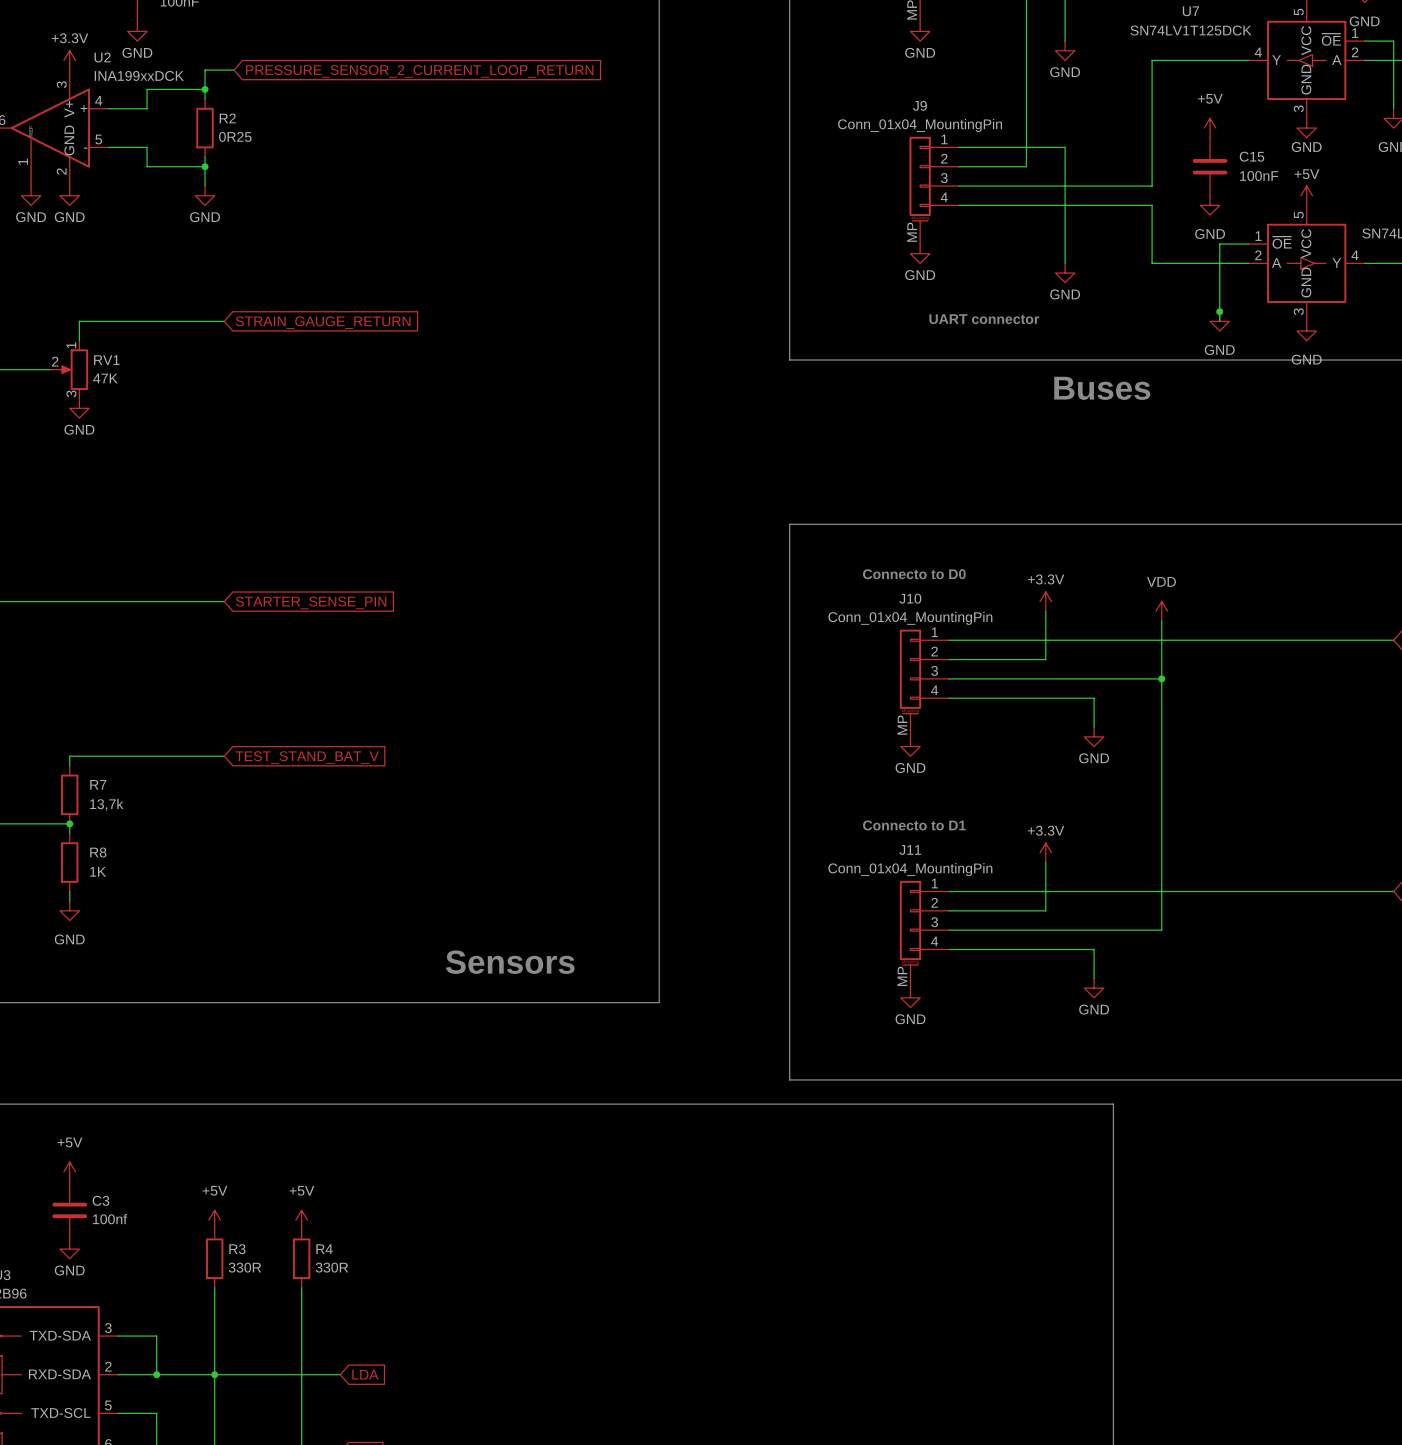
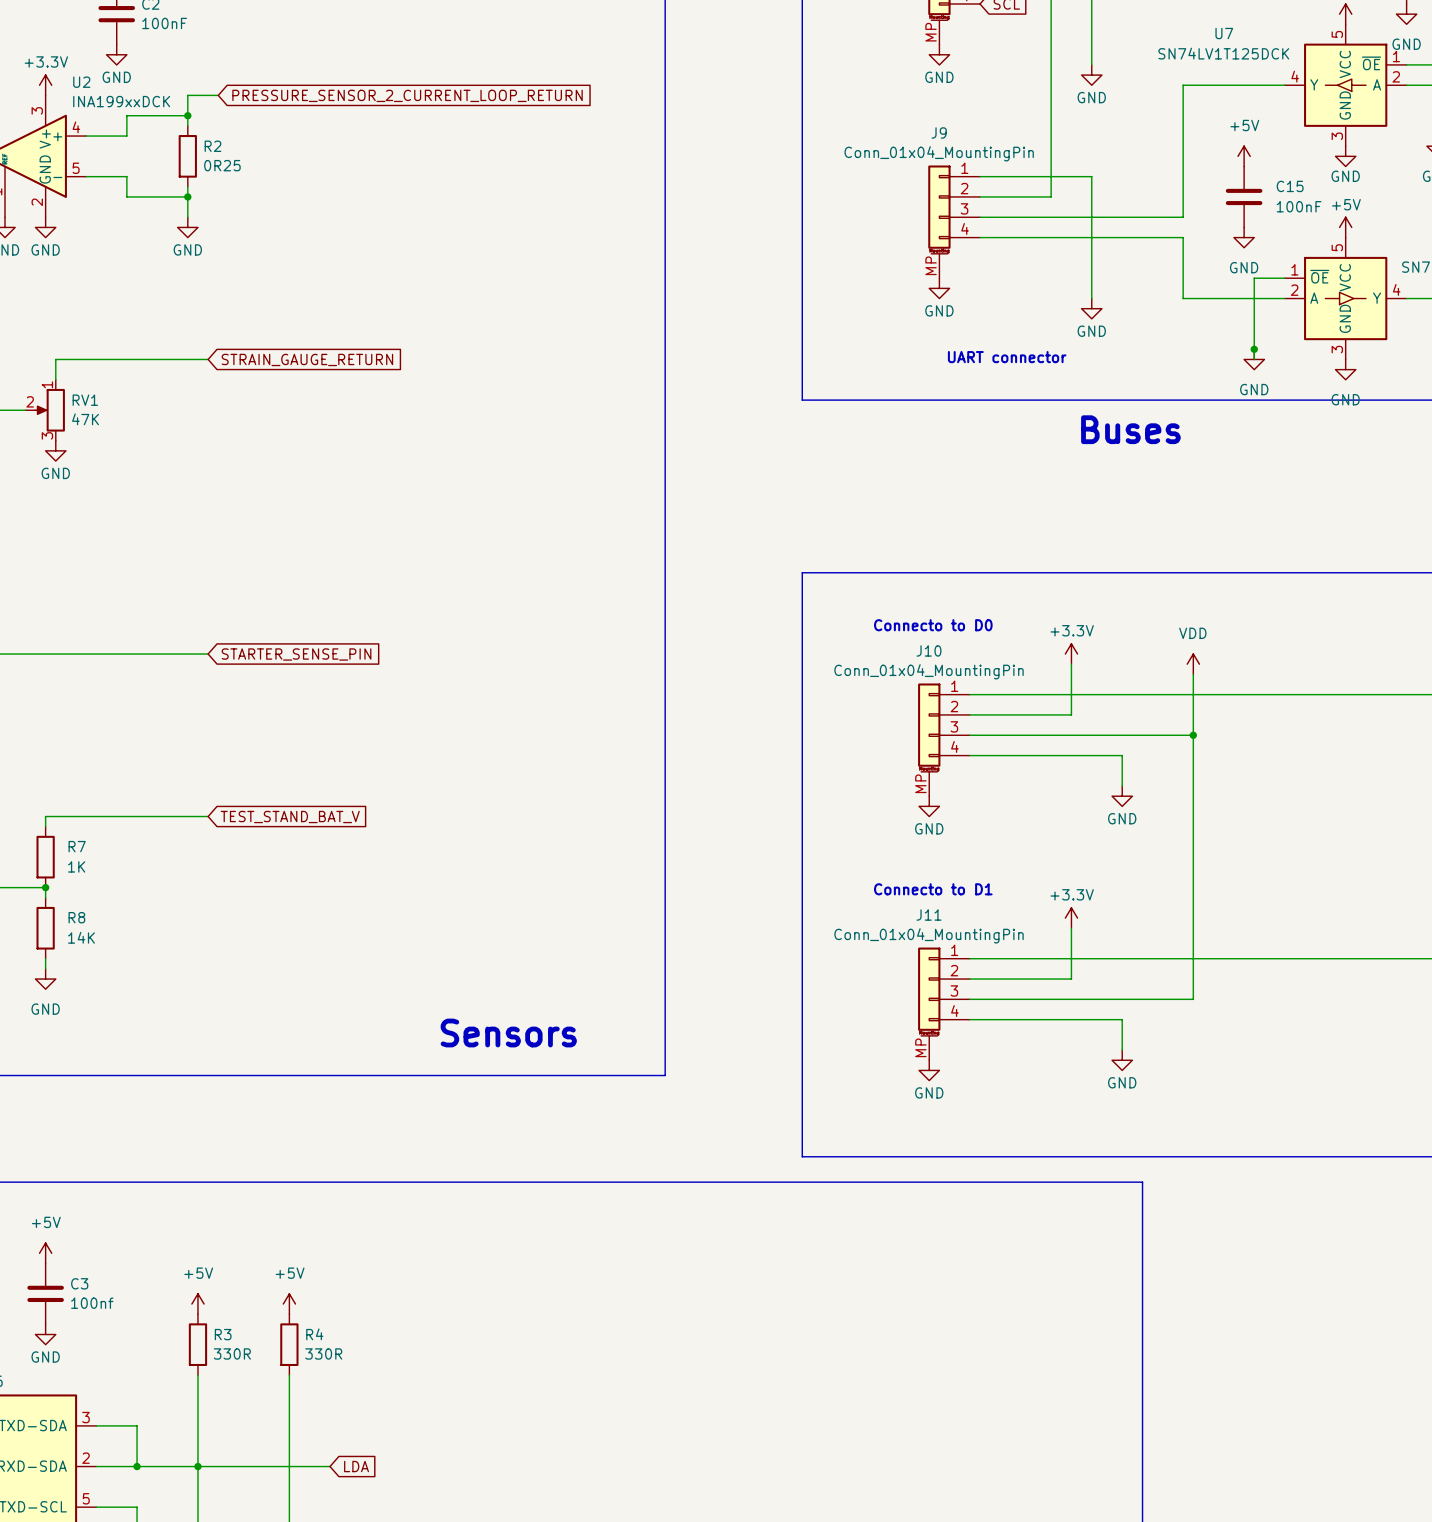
R7 value: 13,7k (106, 804) -> 1K (76, 866)
R8 value: 1K (98, 871) -> 14K (81, 937)

